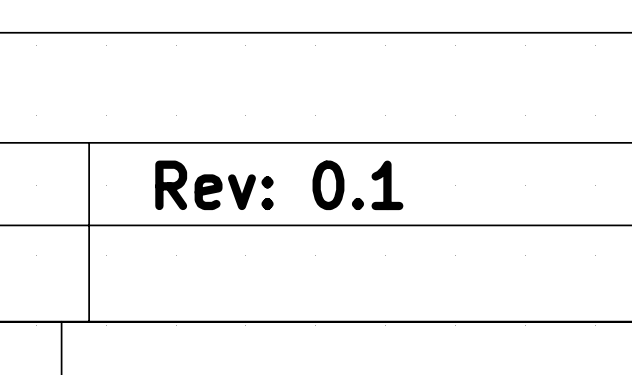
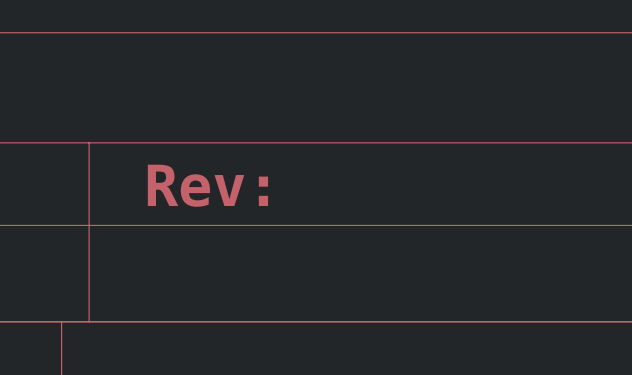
title block: Rev: 0.1 (279, 185) -> Rev: (207, 185)

